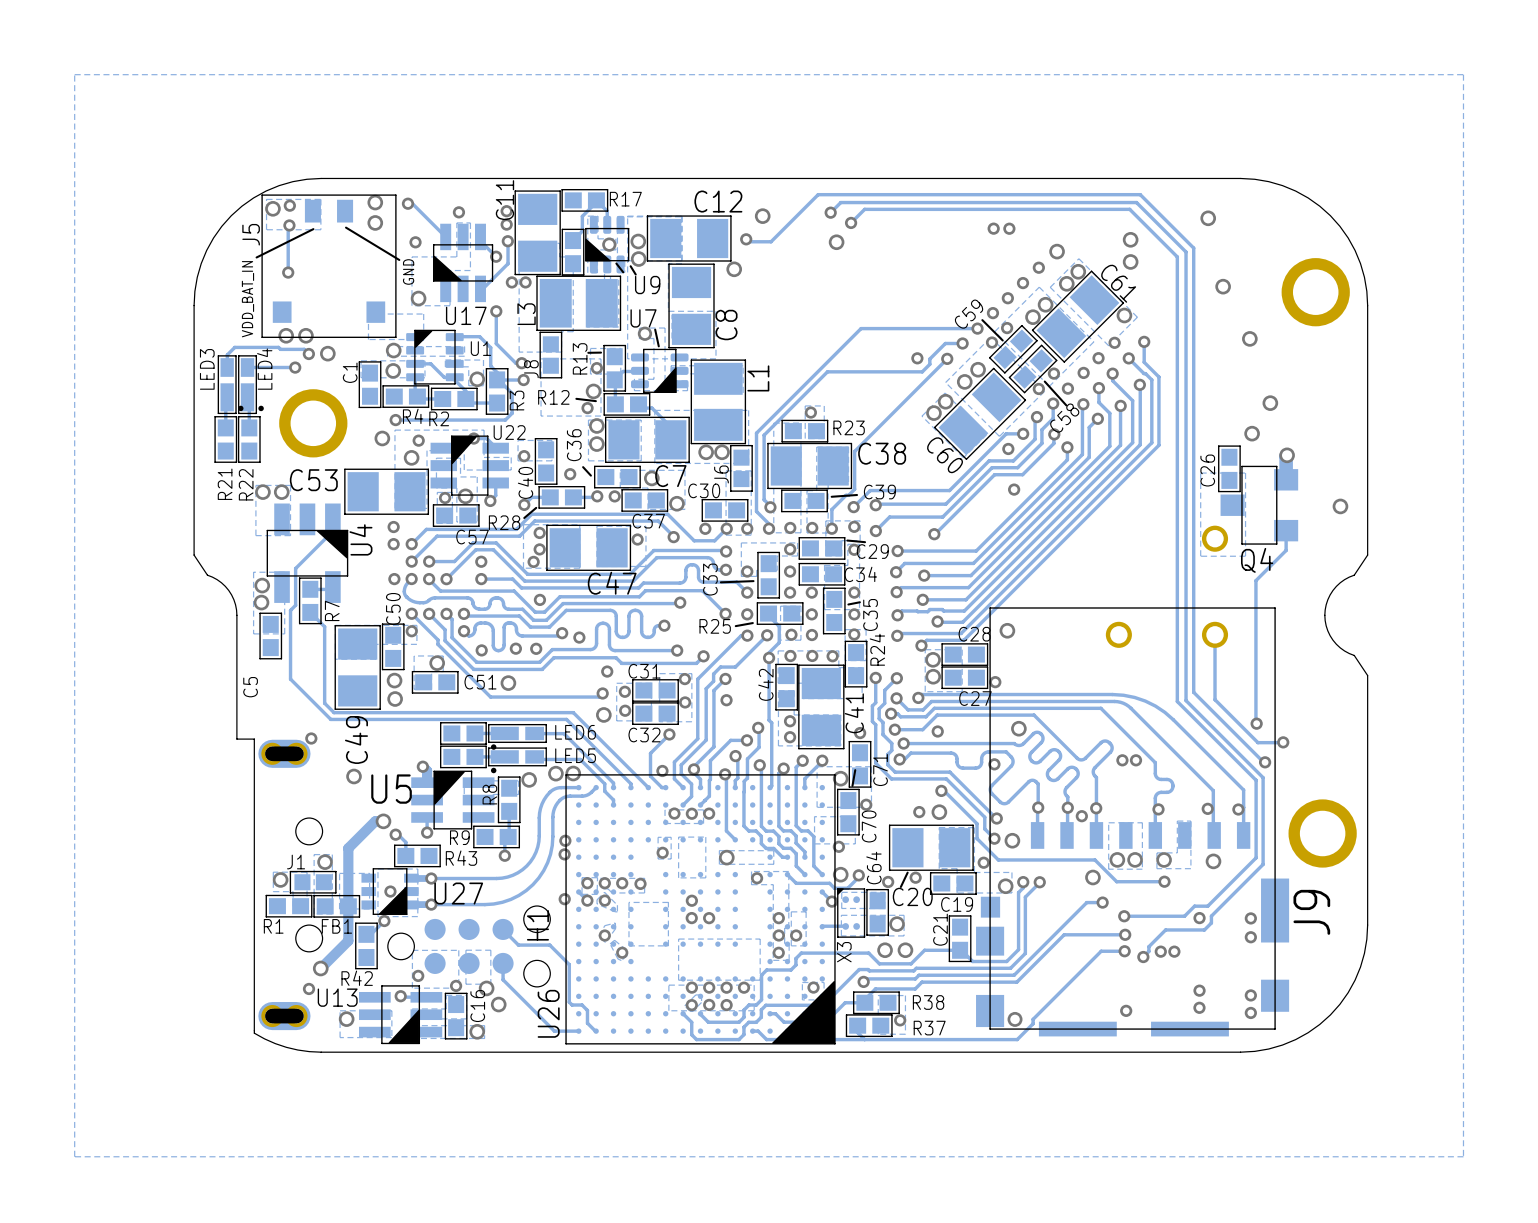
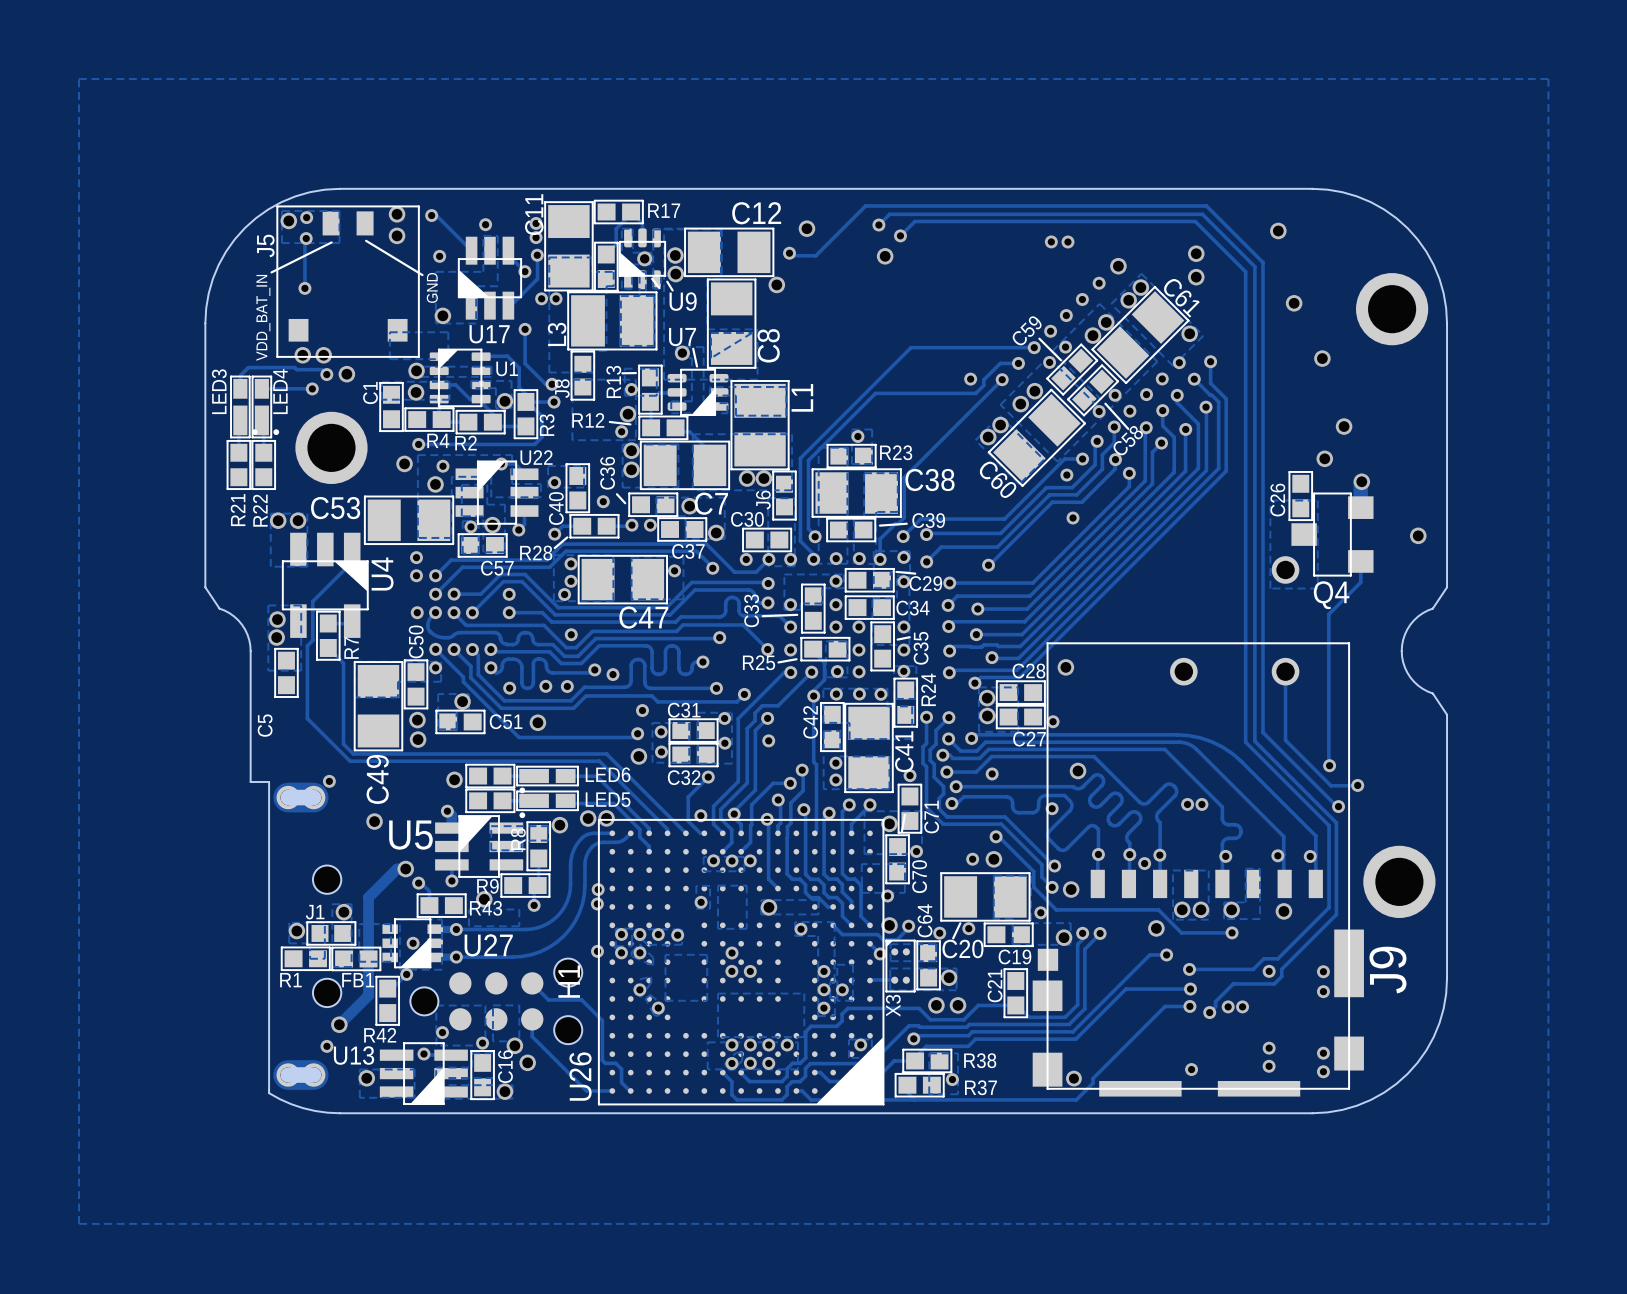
via: none -> (454, 779)
via: none -> (484, 899)
zone outline: none -> (519, 909) (519, 926) (468, 926) (468, 909) (519, 909)

